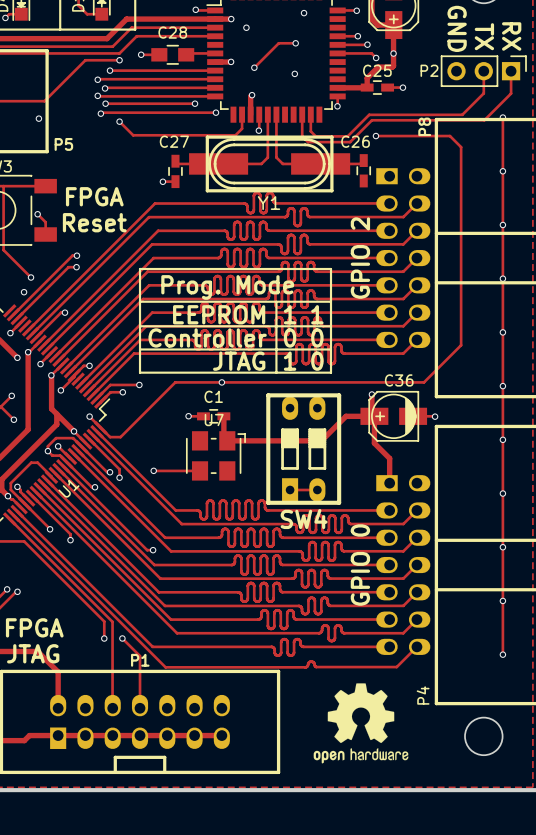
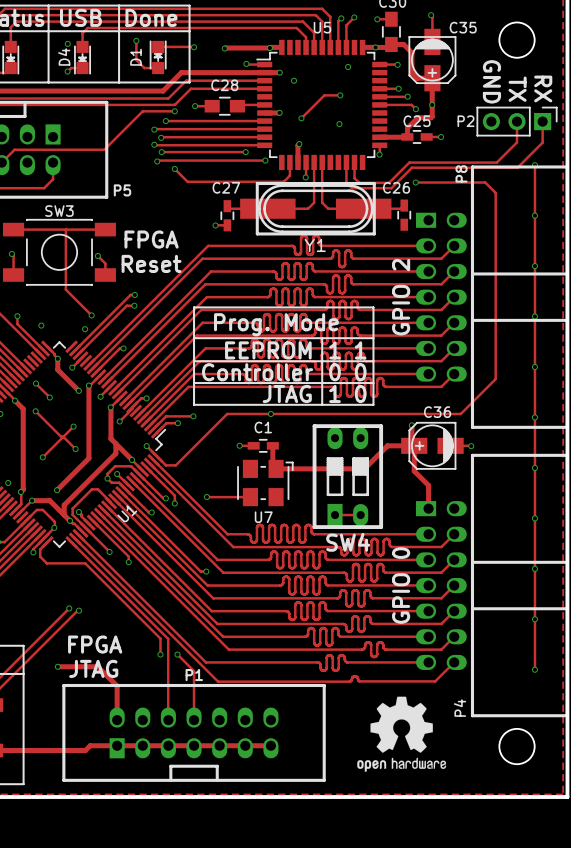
via: (38, 118) -> none
U7 name position: U7 (214, 420) -> U7 (263, 517)

